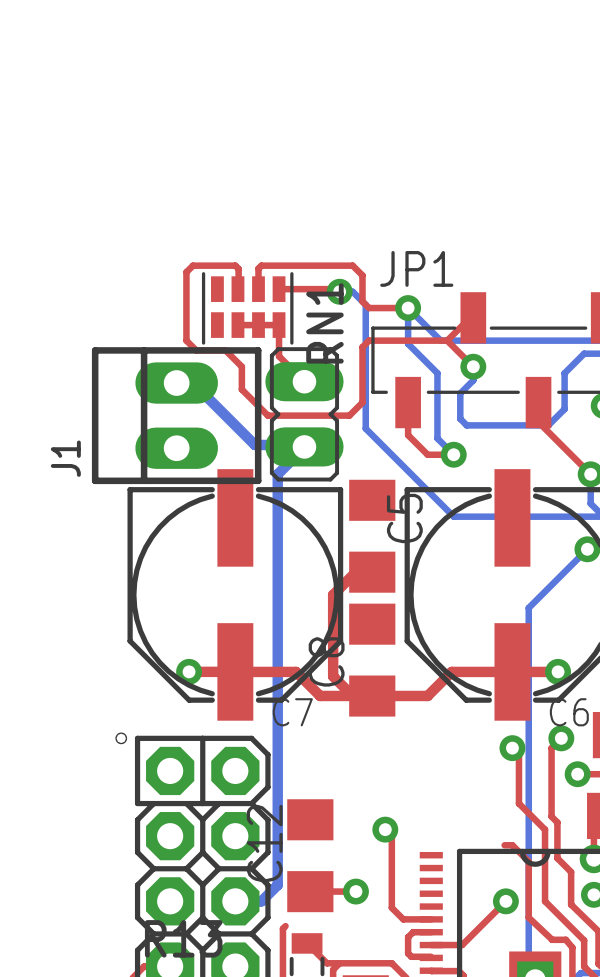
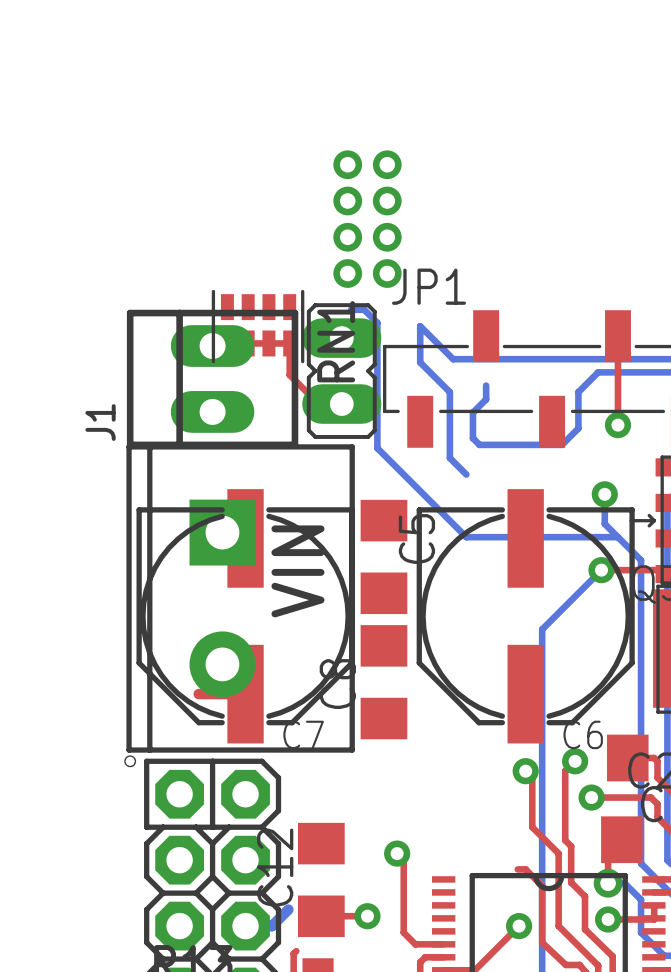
via: none -> (347, 164)
via: none -> (387, 164)
via: none -> (347, 201)
via: none -> (387, 201)
via: none -> (347, 237)
via: none -> (387, 237)
via: none -> (347, 273)
via: none -> (387, 273)
top track: (237, 289) (238, 268) (235, 265) (192, 265) (186, 272) (186, 340) (196, 350) (225, 350) (241, 366) (241, 389) (267, 415) (349, 415) (362, 402) (362, 347) (369, 340) (447, 340) -> none
top track: (258, 289) (258, 268) (261, 265) (352, 265) (362, 275) (362, 301) (369, 308) (408, 308) -> none
top track: (279, 289) (337, 289) (339, 291) -> none
via: (339, 291) -> none
via: (408, 308) -> none
top track: (473, 317) (470, 317) (447, 340) -> none
top track: (447, 340) (473, 366) -> none
via: (473, 366) -> none
bottom track: (176, 383) (192, 383) (254, 444) (307, 444) (277, 474) (277, 885) -> none
top track: (408, 402) (408, 435) (427, 454) (453, 454) -> none
top track: (538, 402) (538, 422) (590, 474) -> none
part position: (304, 414) -> (341, 371)
J1 position: (176, 415) -> (212, 378)
via: (453, 454) -> none
top track: (372, 572) (355, 572) (333, 594) (333, 676) (352, 695) -> none
VIN: none -> (240, 598)
via: (189, 671) -> none
top track: (235, 671) (296, 671) (320, 695) (352, 695) -> none
top track: (558, 671) (451, 671) (427, 695) (372, 695) -> none
via: (558, 671) -> none

